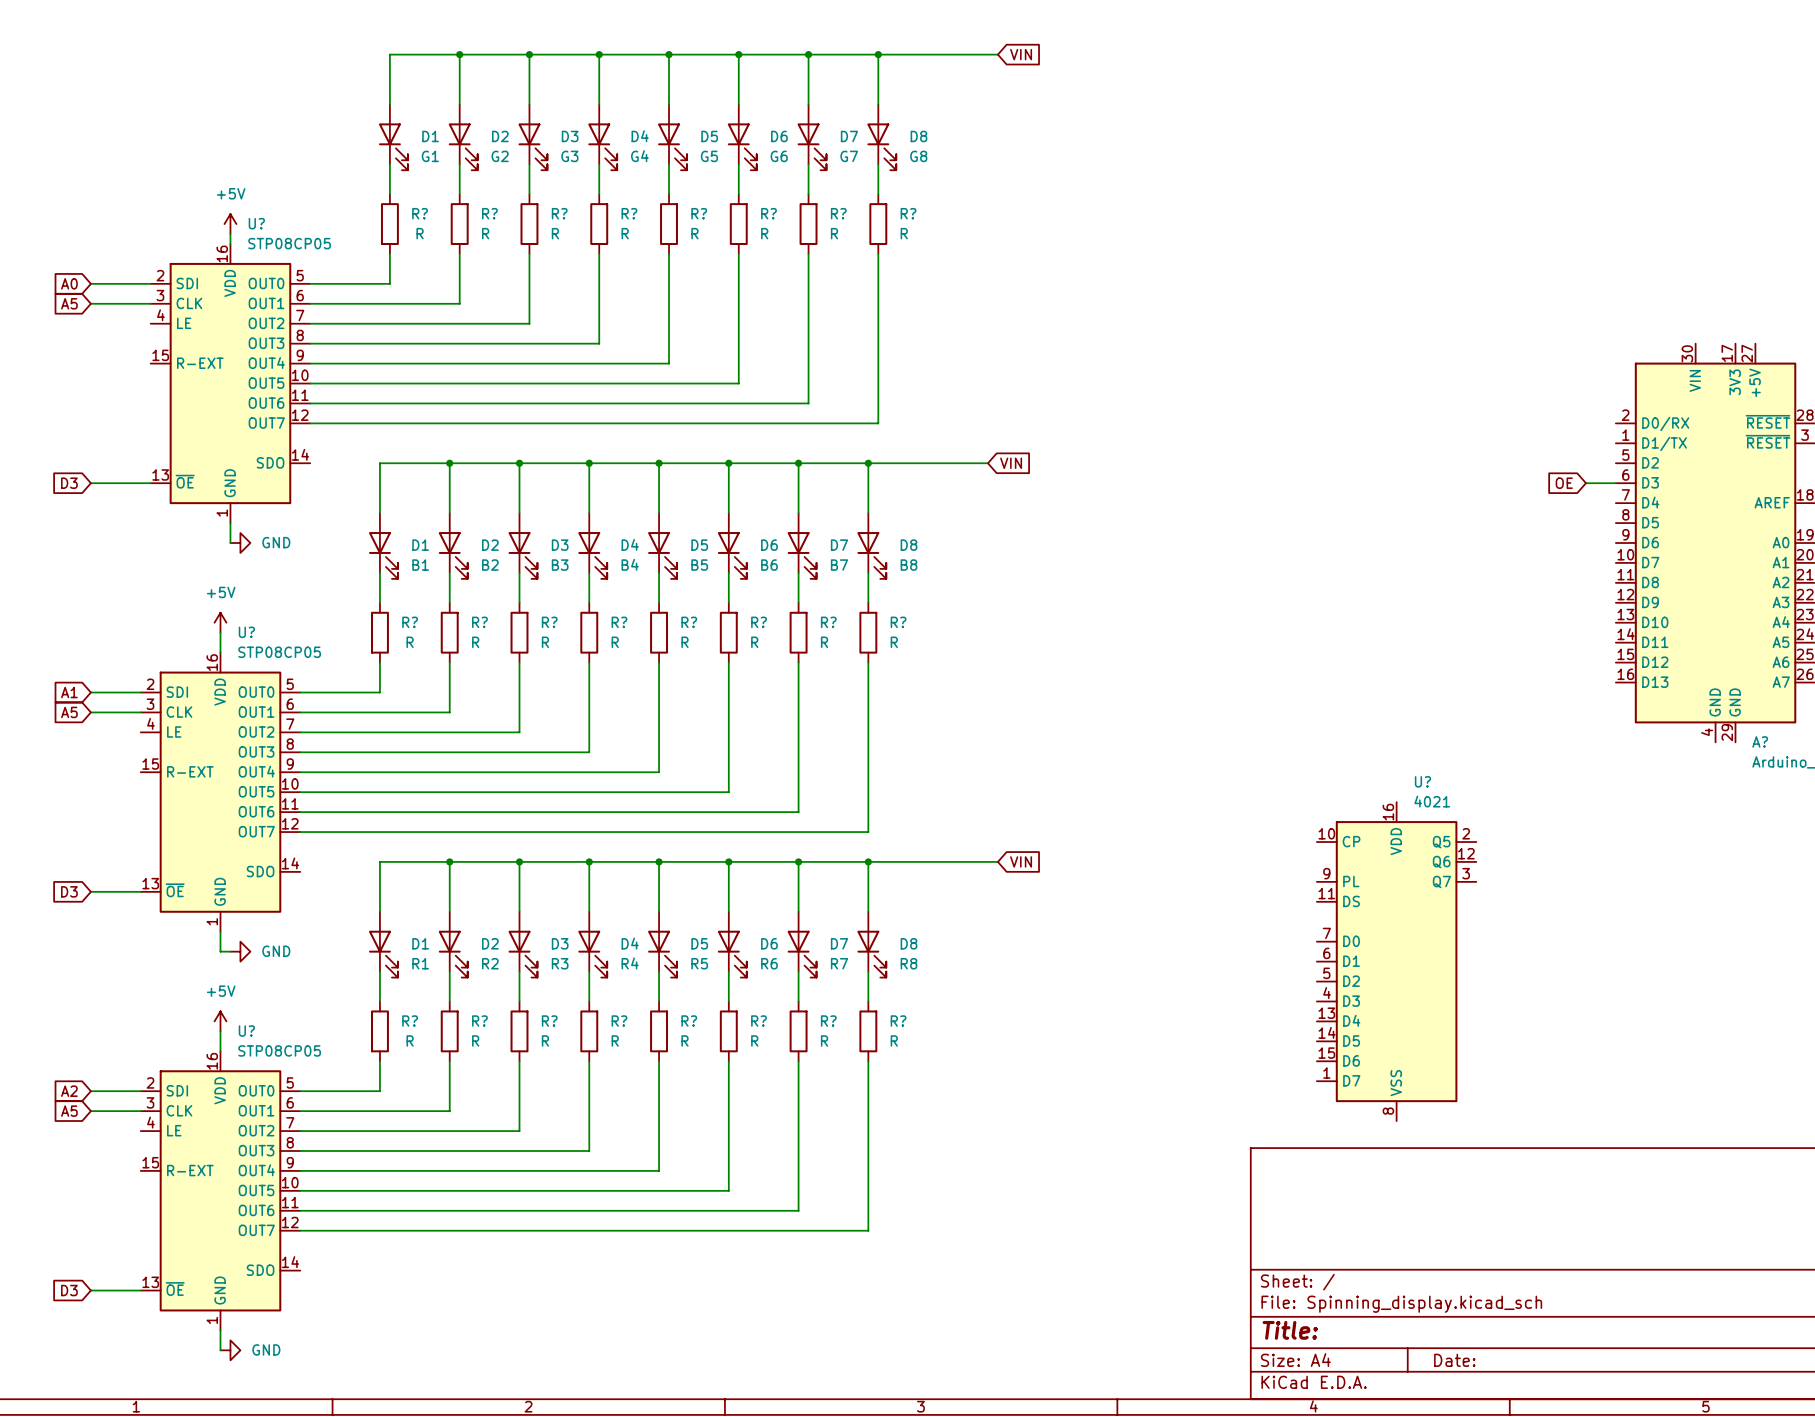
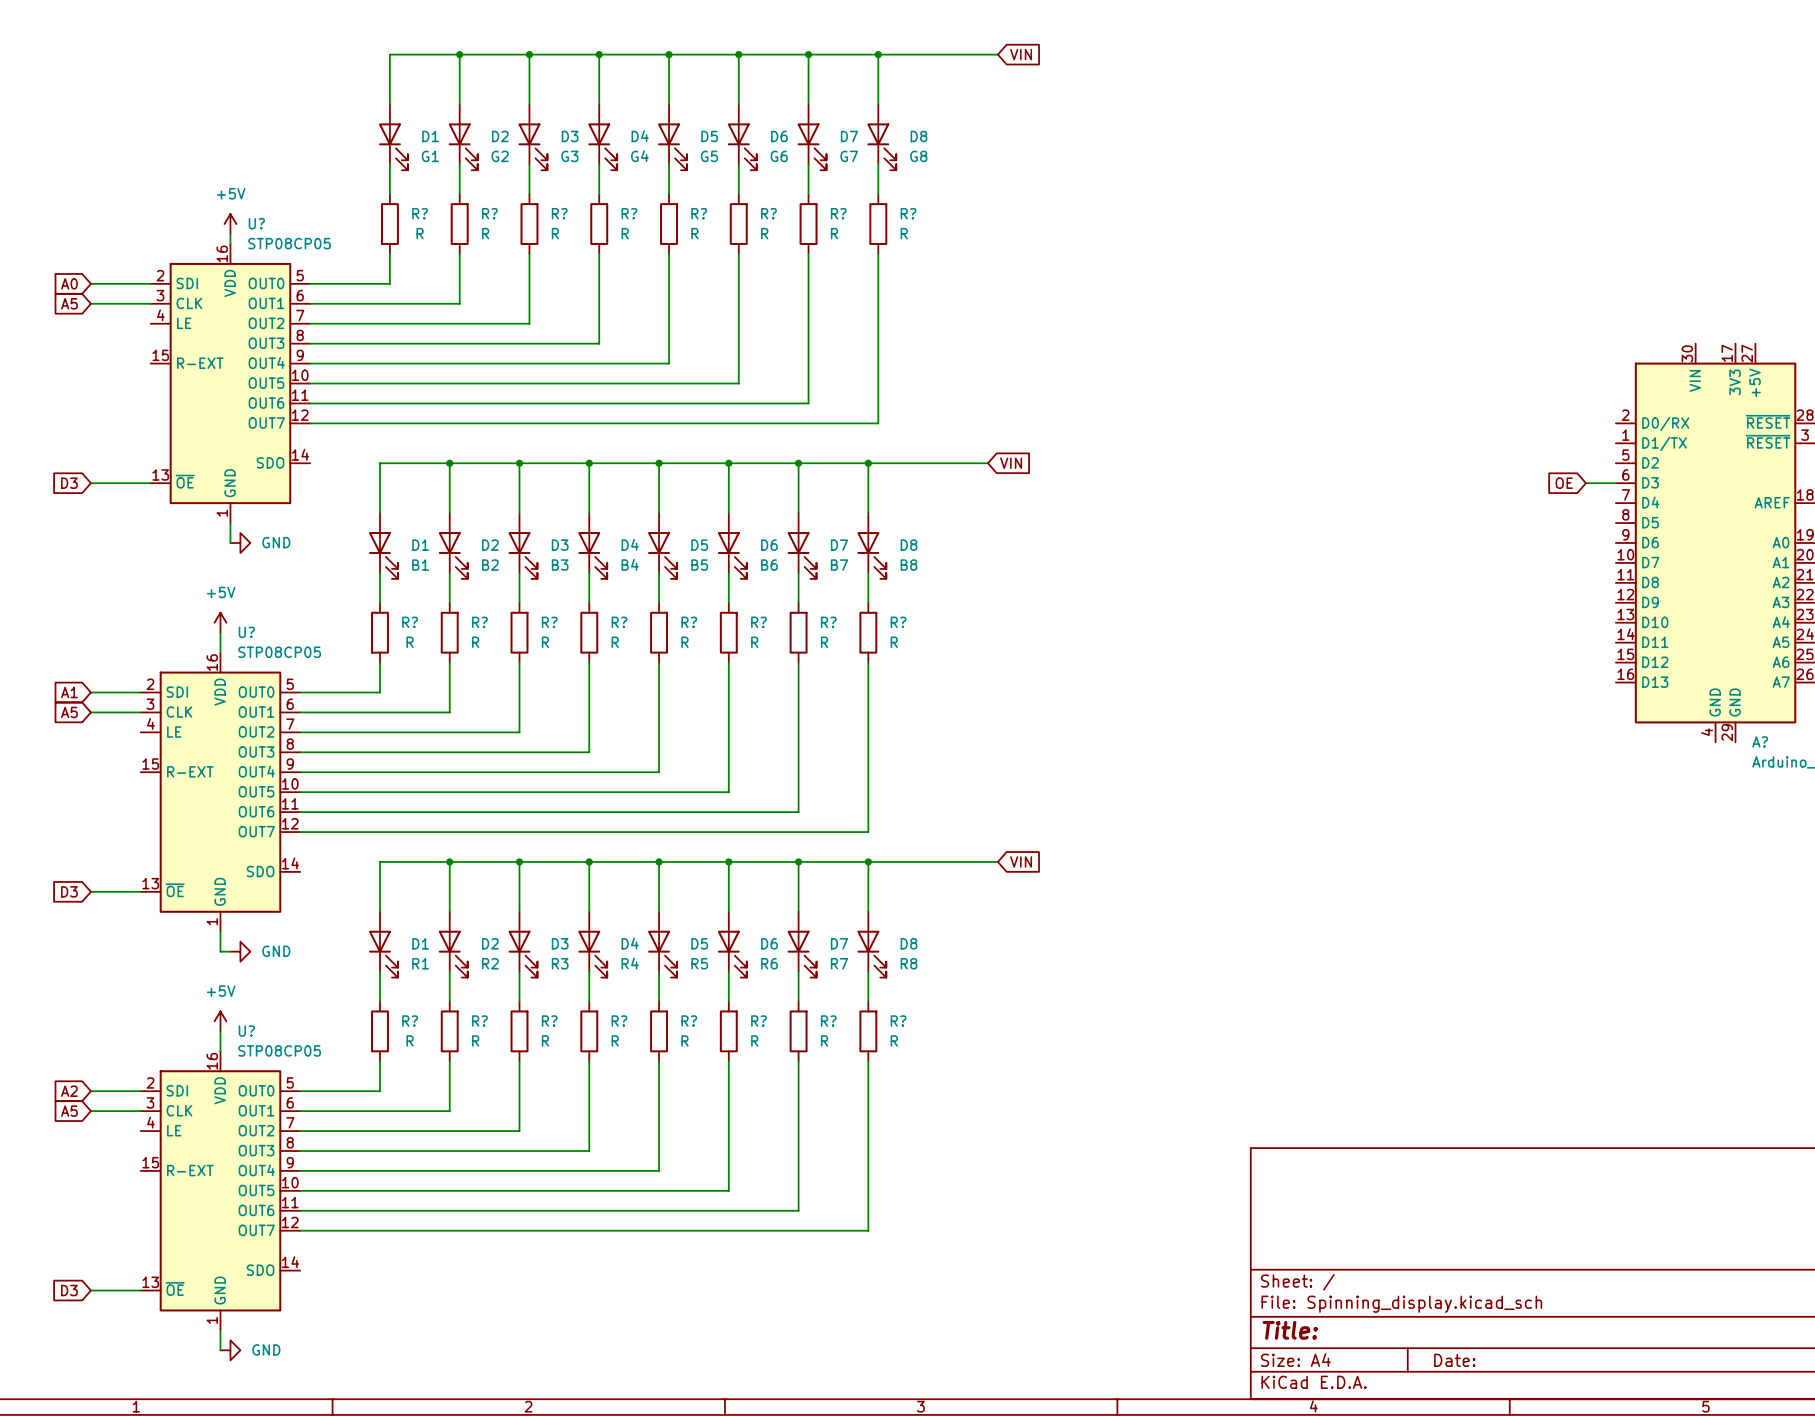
U?: 4021 (1396, 961) -> none

